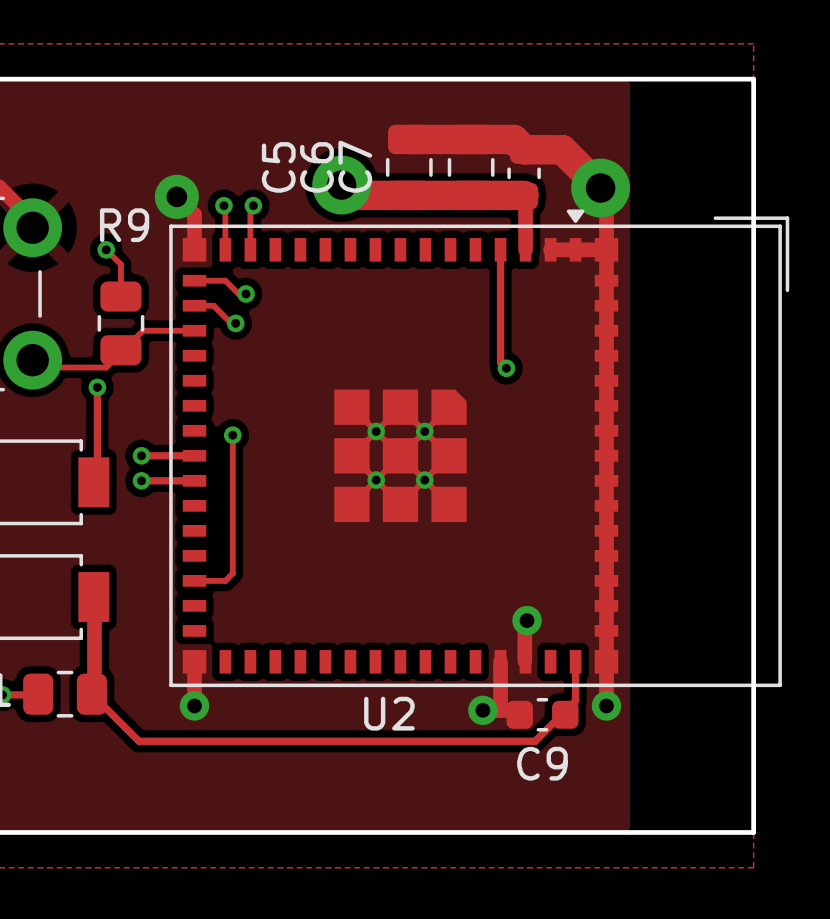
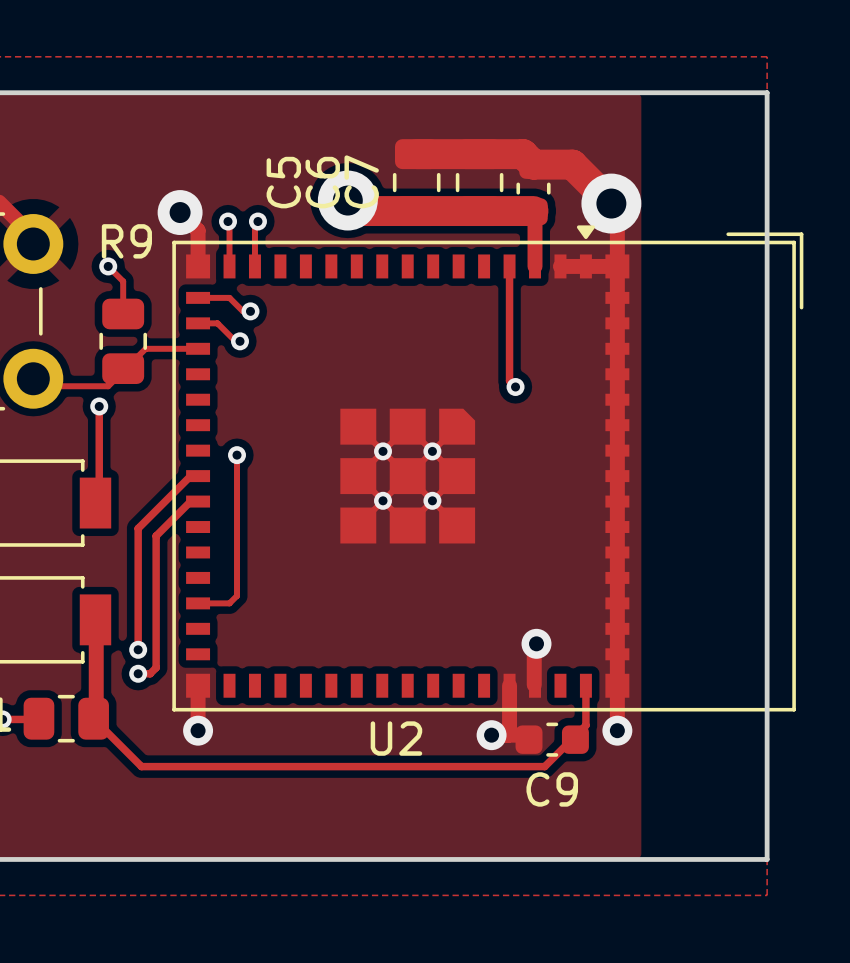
track: (141, 455) (187, 455) -> (138, 649) (138, 528) (190, 476)
via: (141, 455) -> none
track: (141, 480) (187, 480) -> (138, 673) (150, 673) (156, 667) (156, 536) (190, 501)
via: (141, 480) -> none
via: none -> (138, 649)
via: none -> (138, 673)

